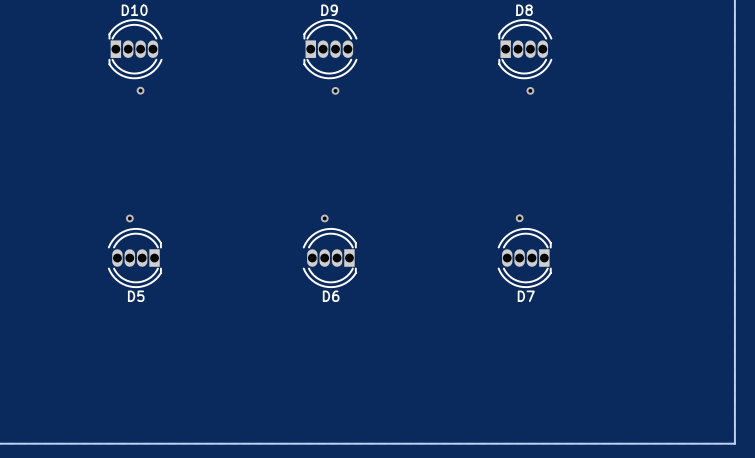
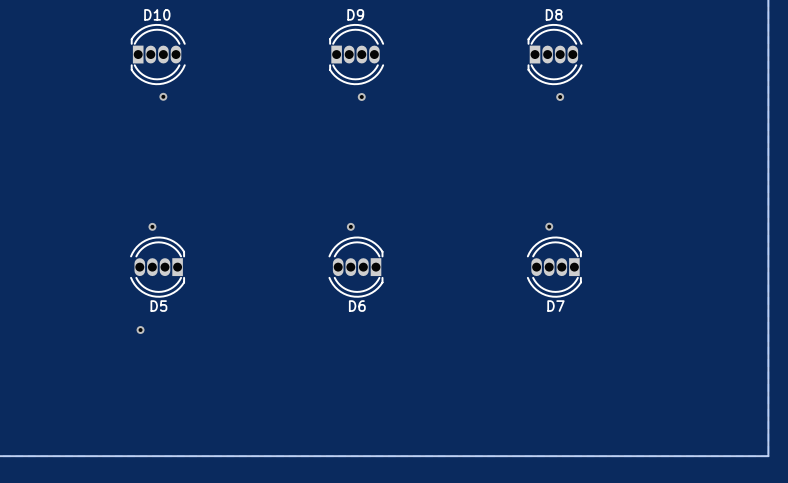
via: none -> (140, 330)

